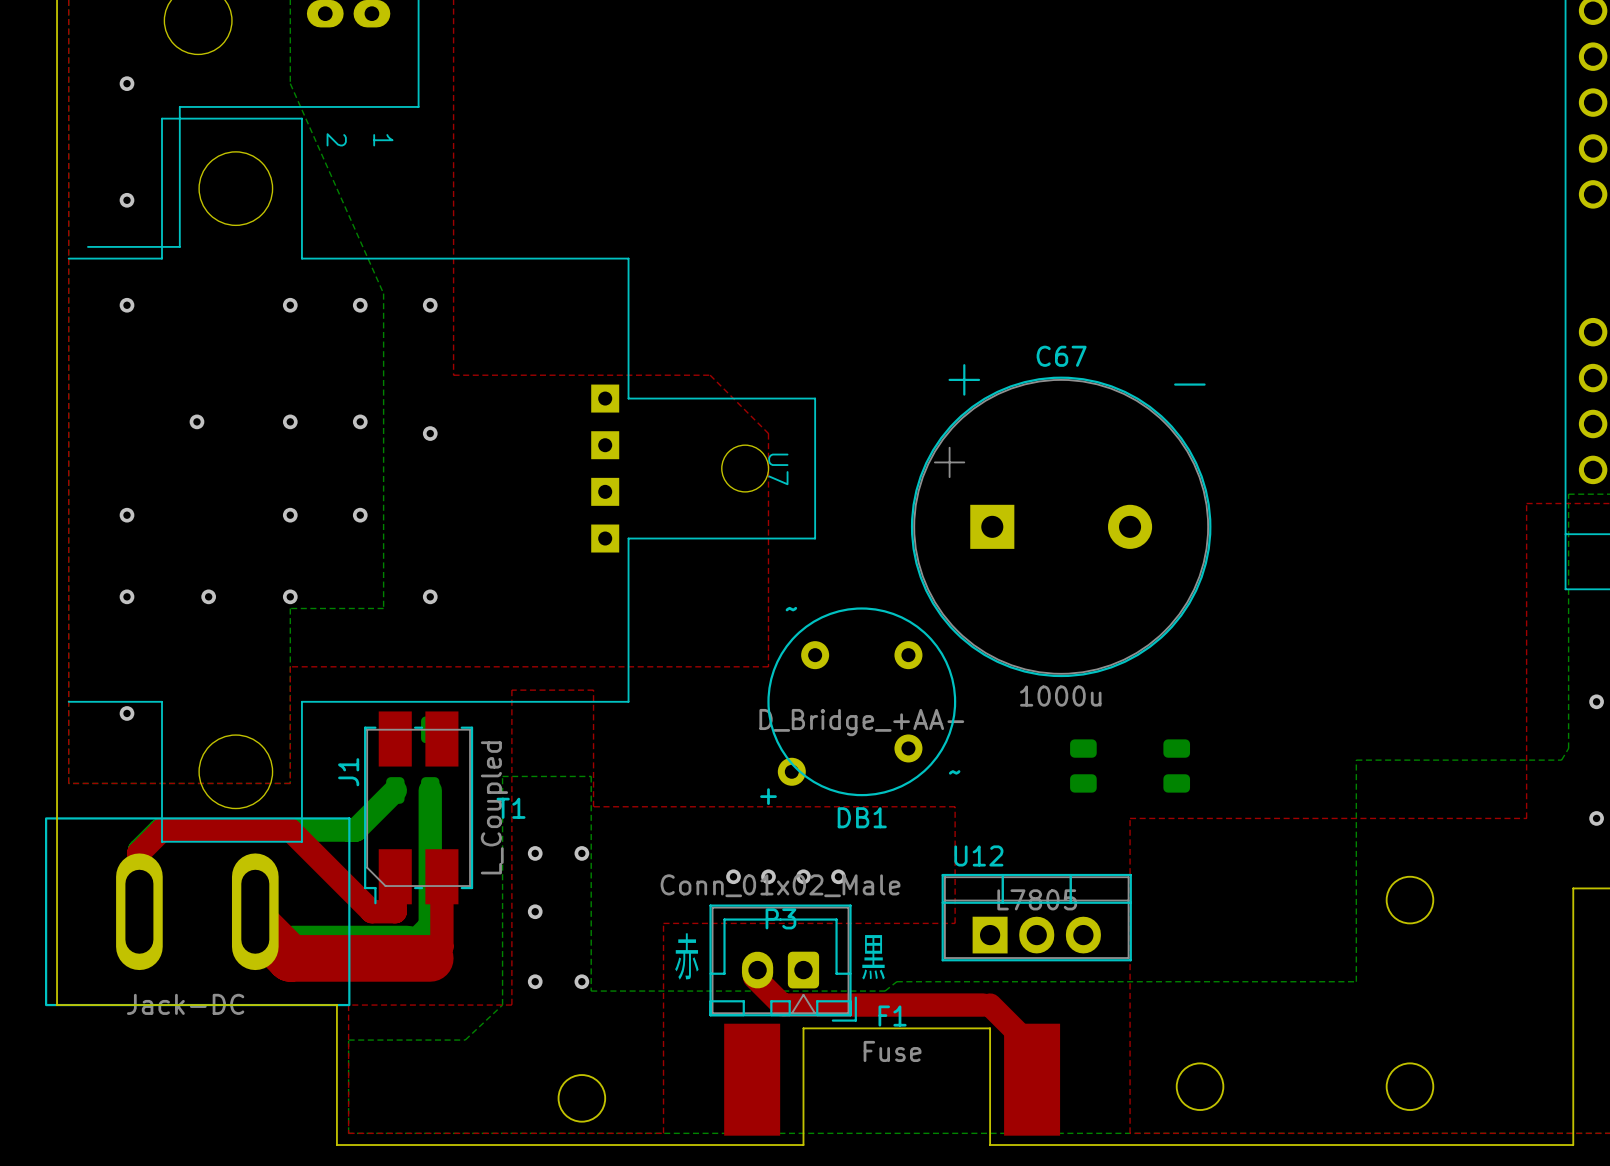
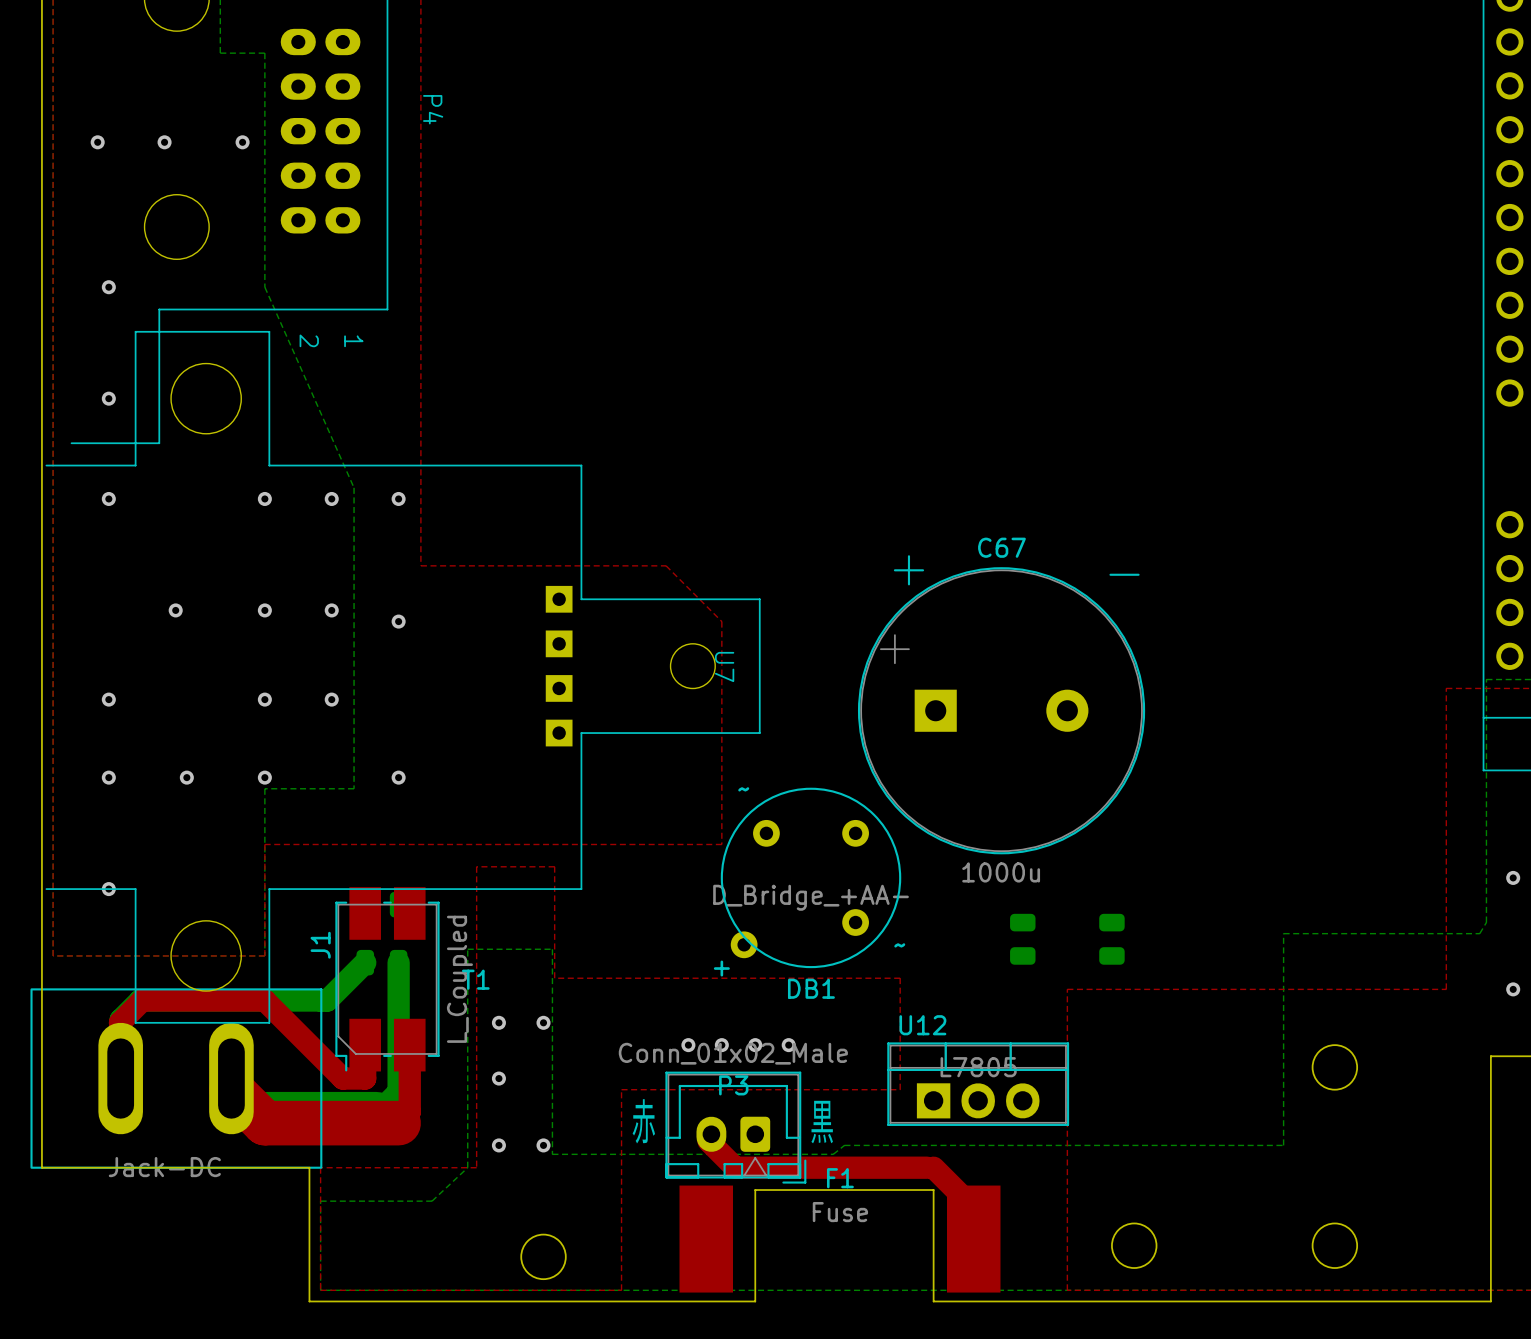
U7 position: (441, 480) -> (403, 677)

